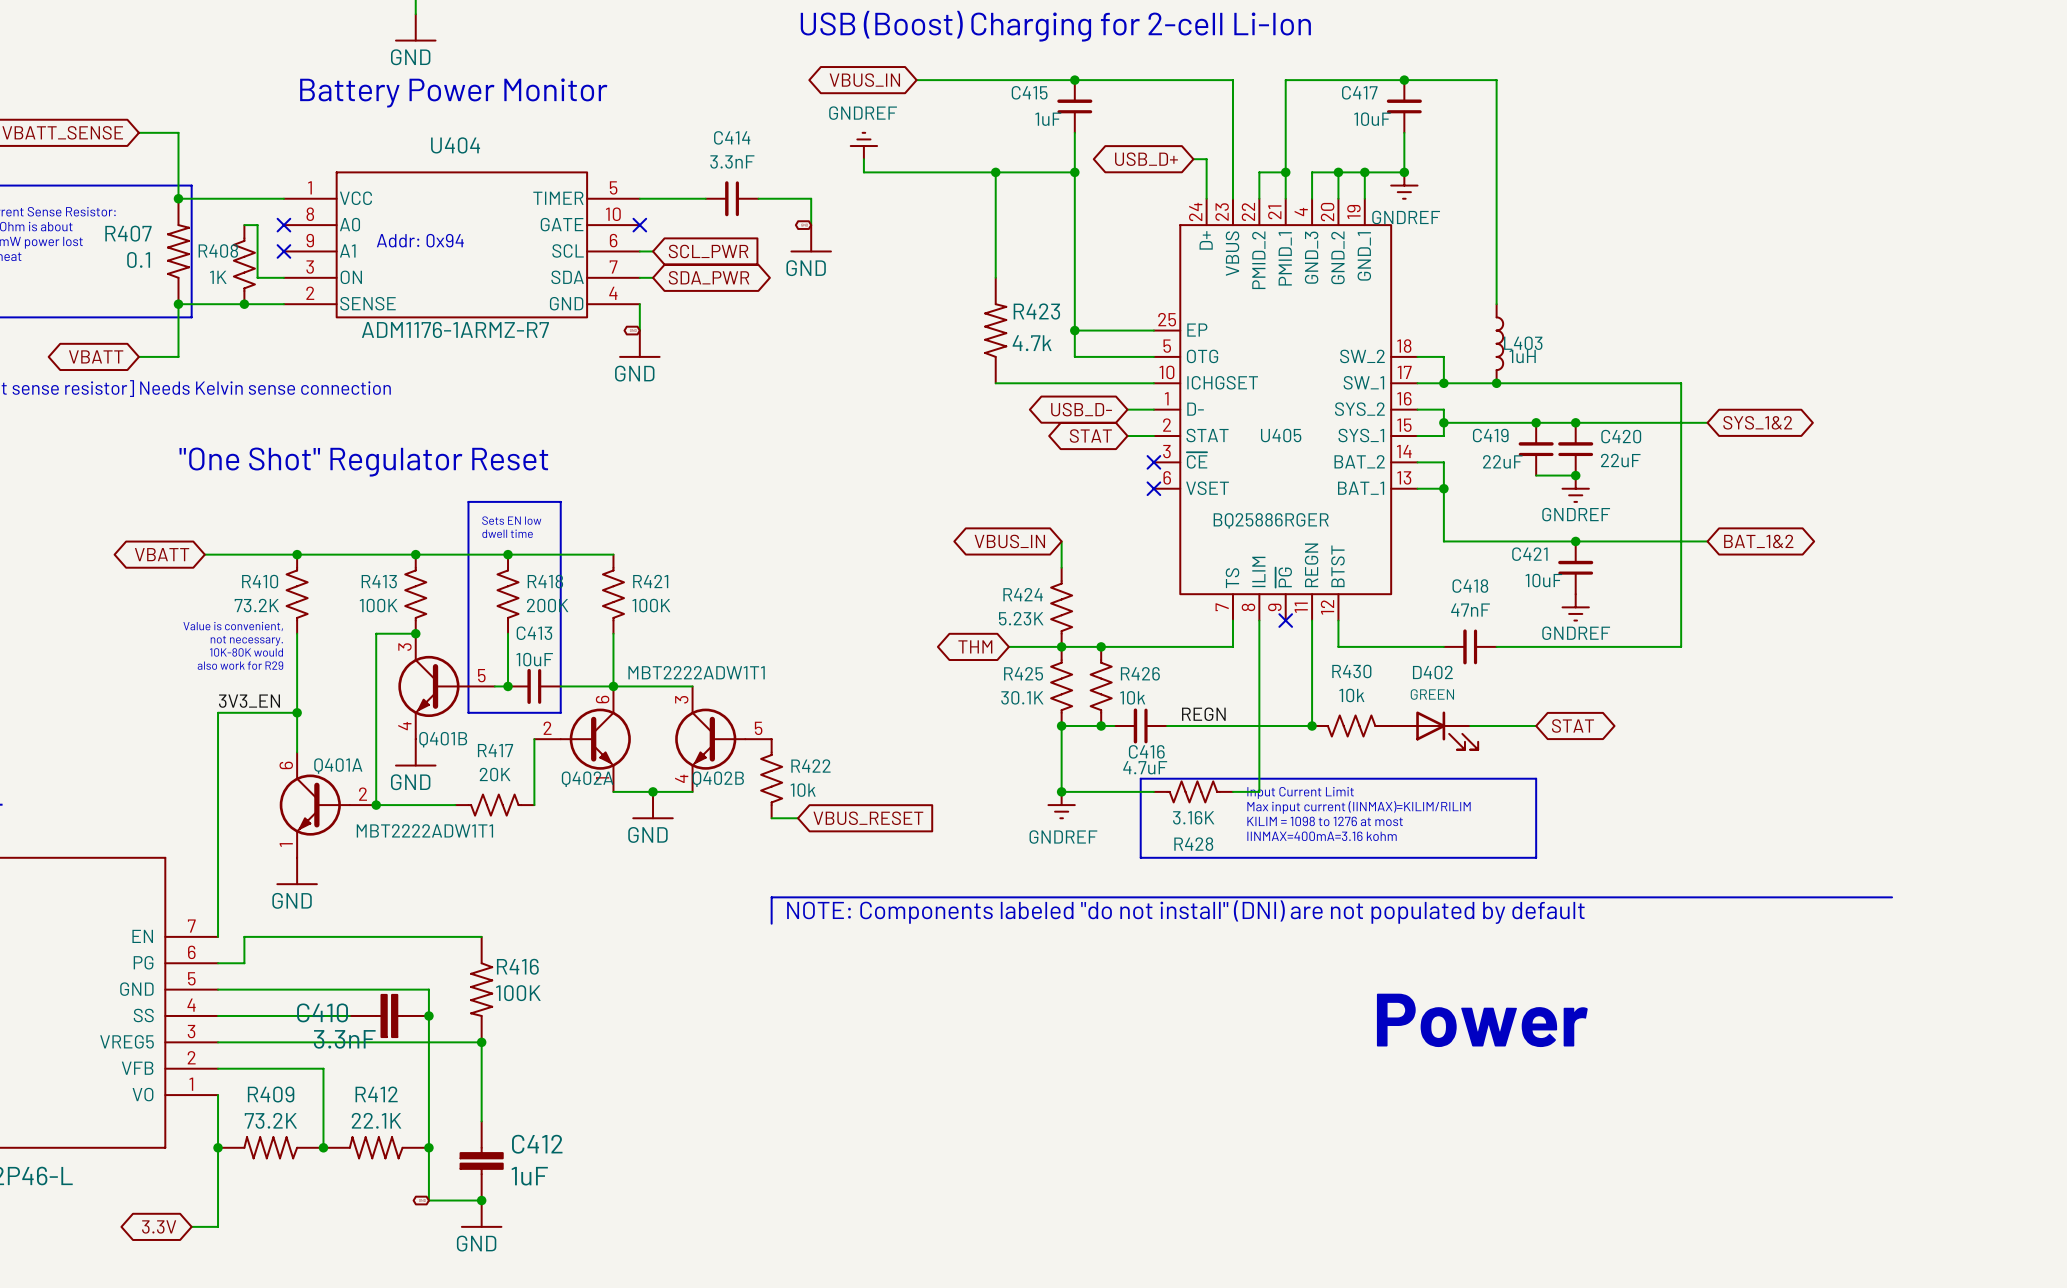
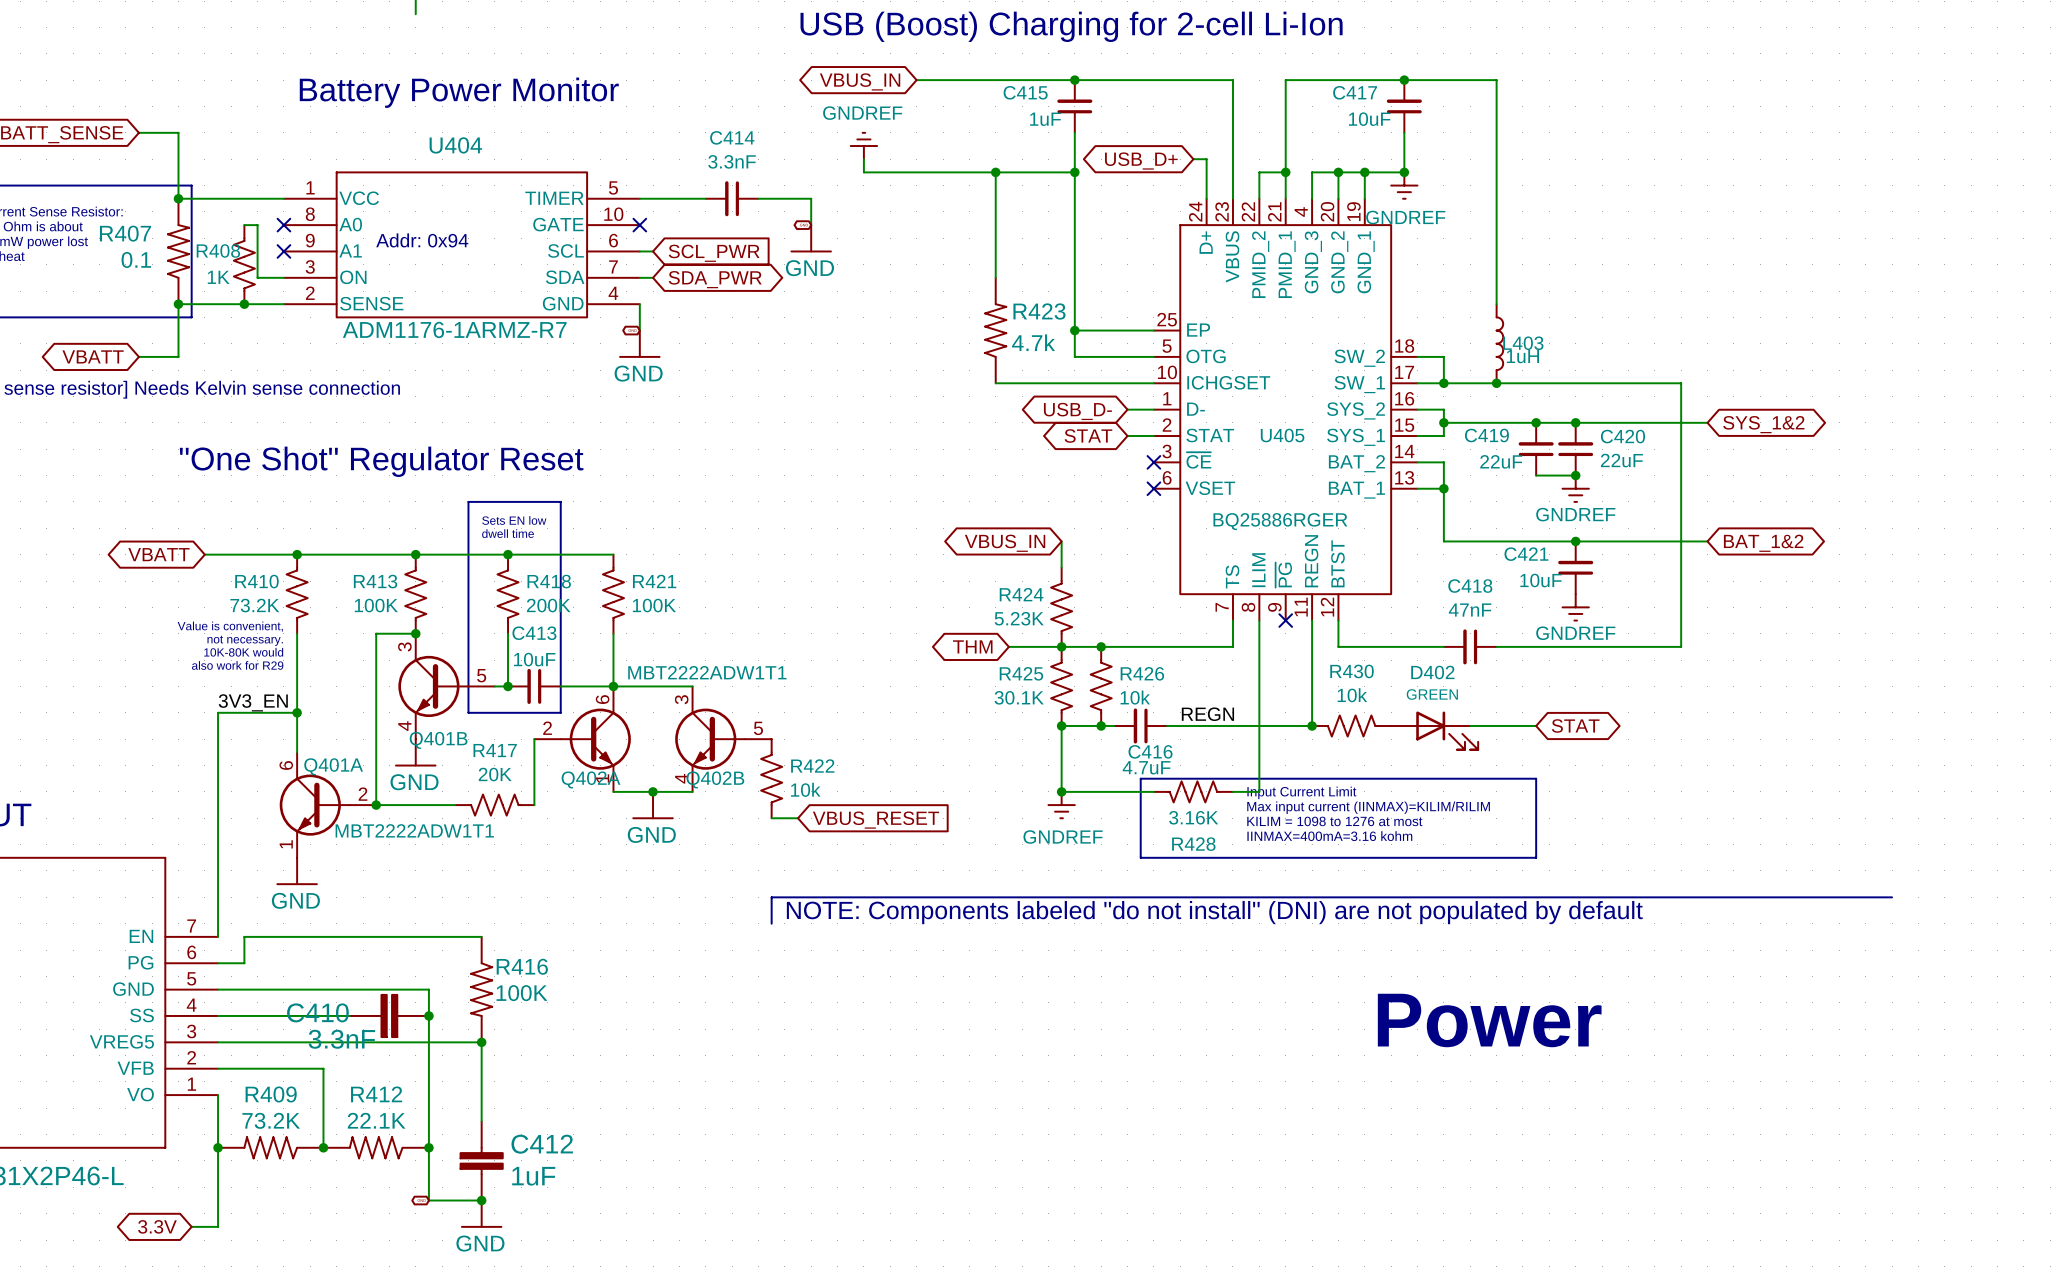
power symbol: GND (415, 27) -> none

